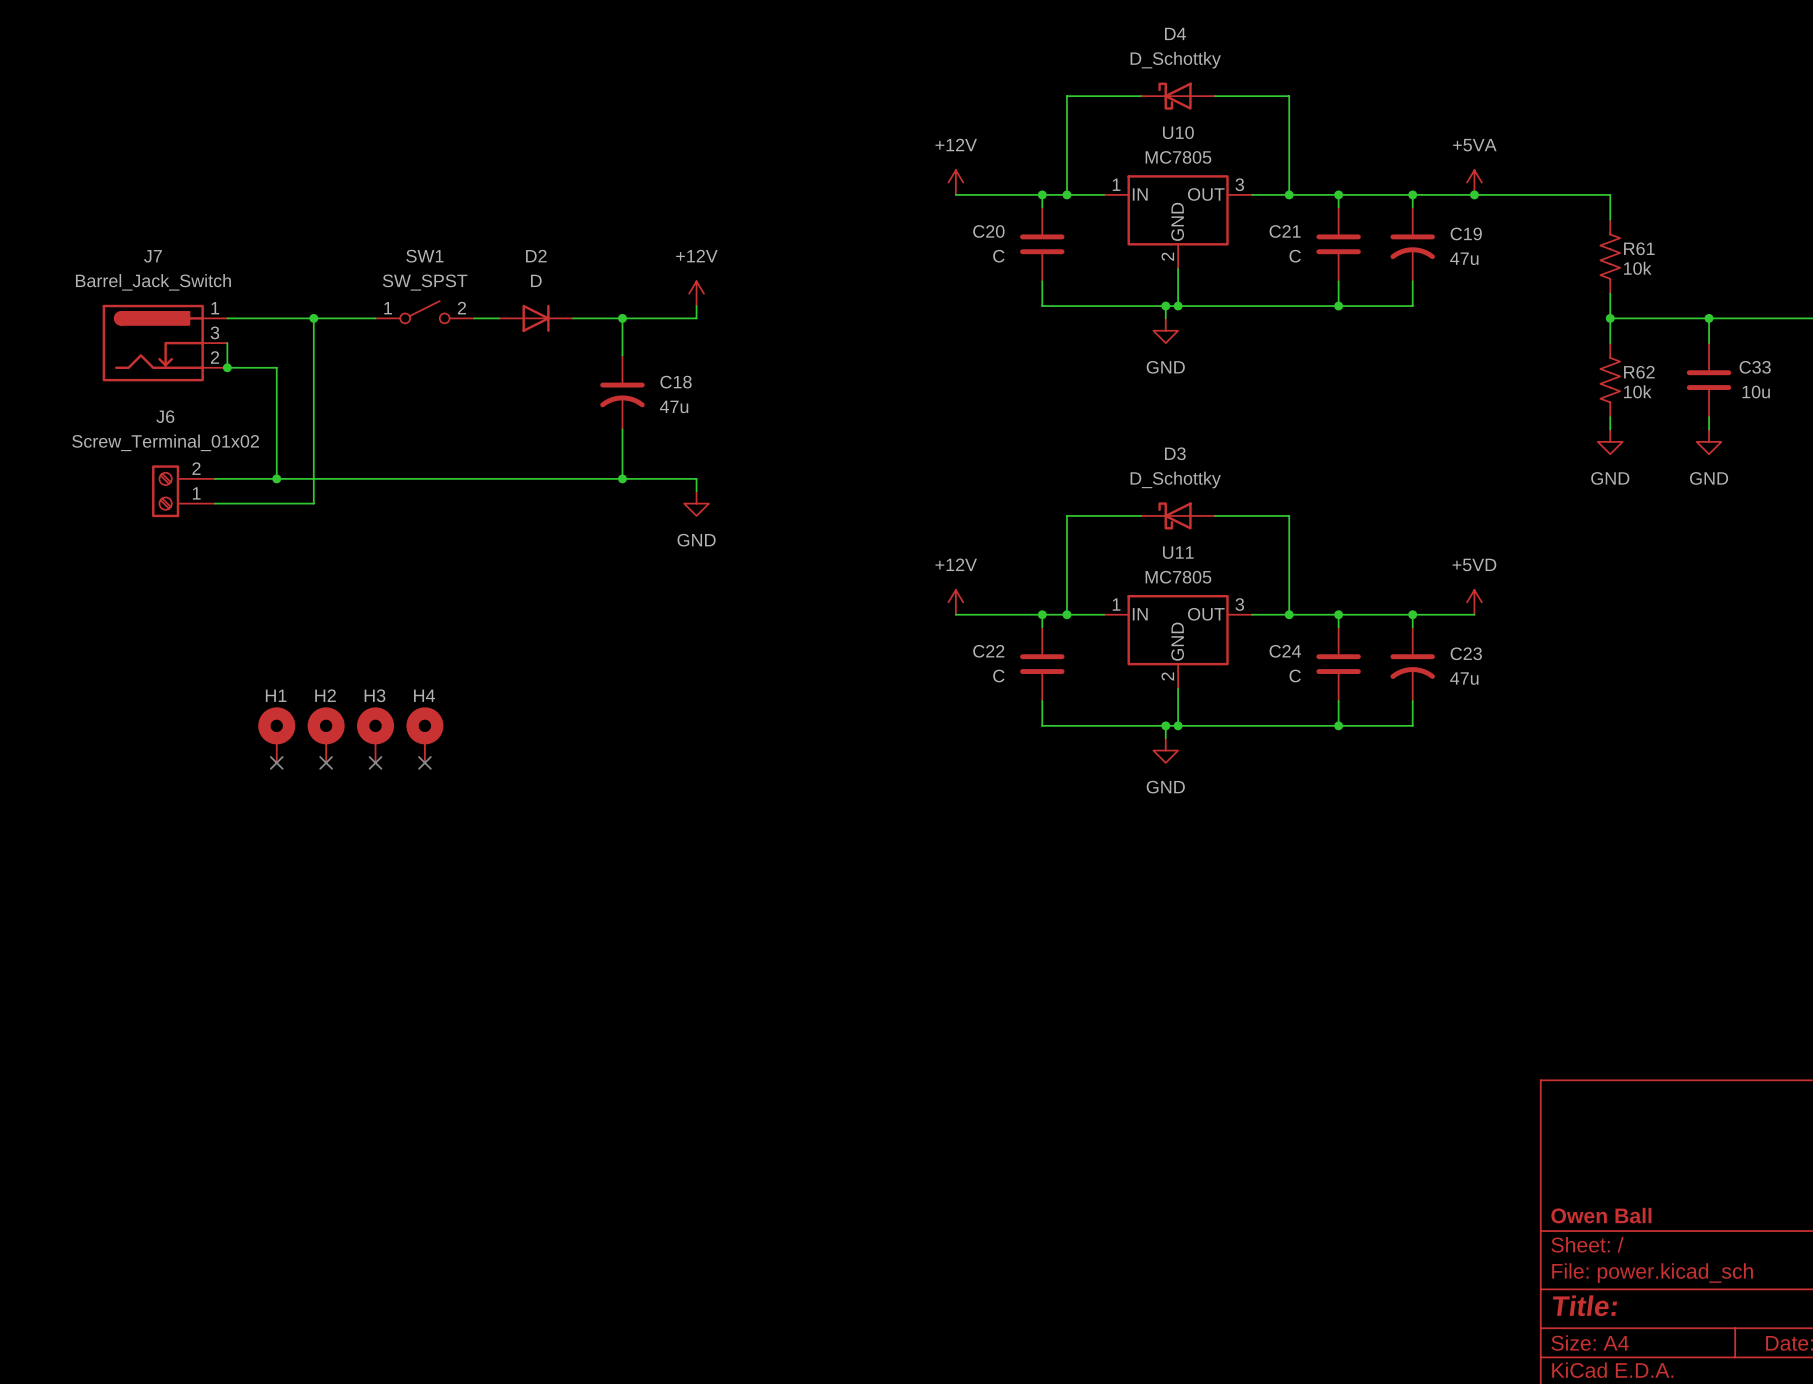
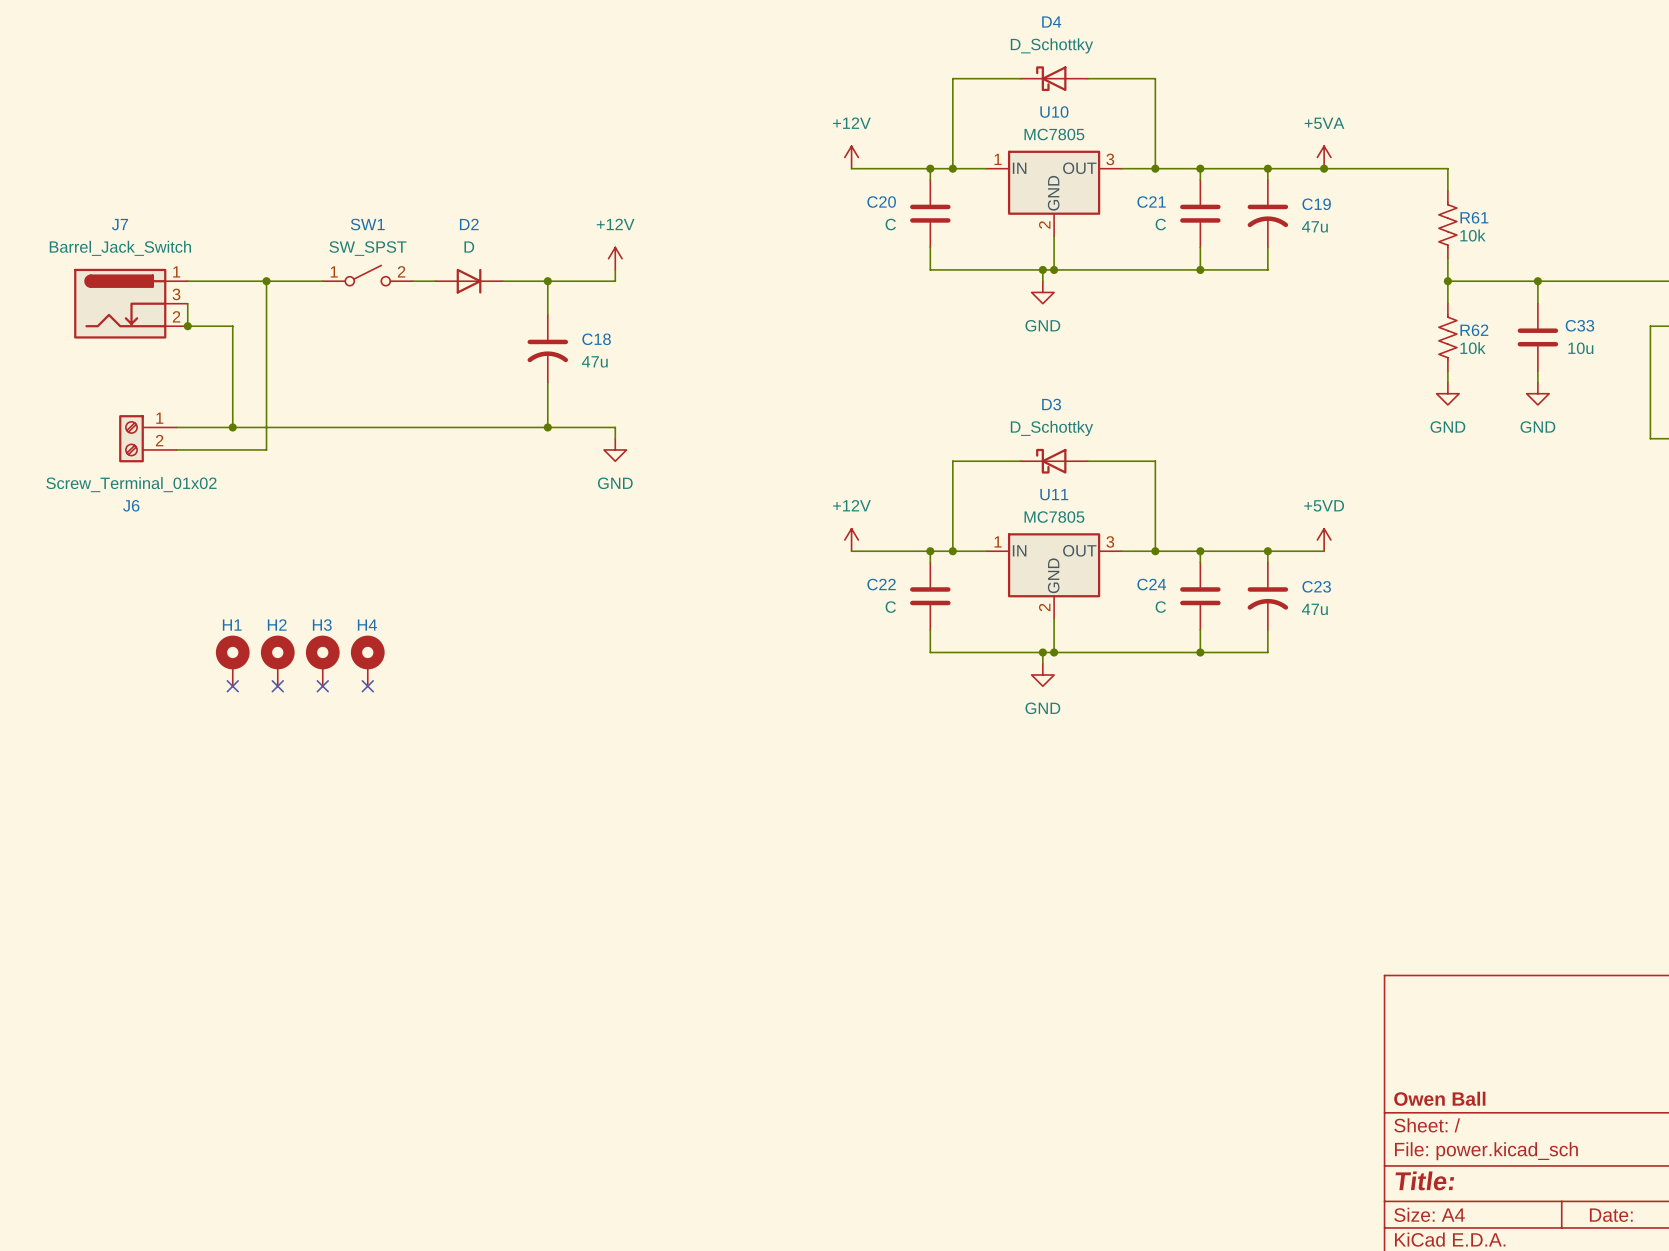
J6 flip: as is (165, 491) -> up-down (131, 438)

